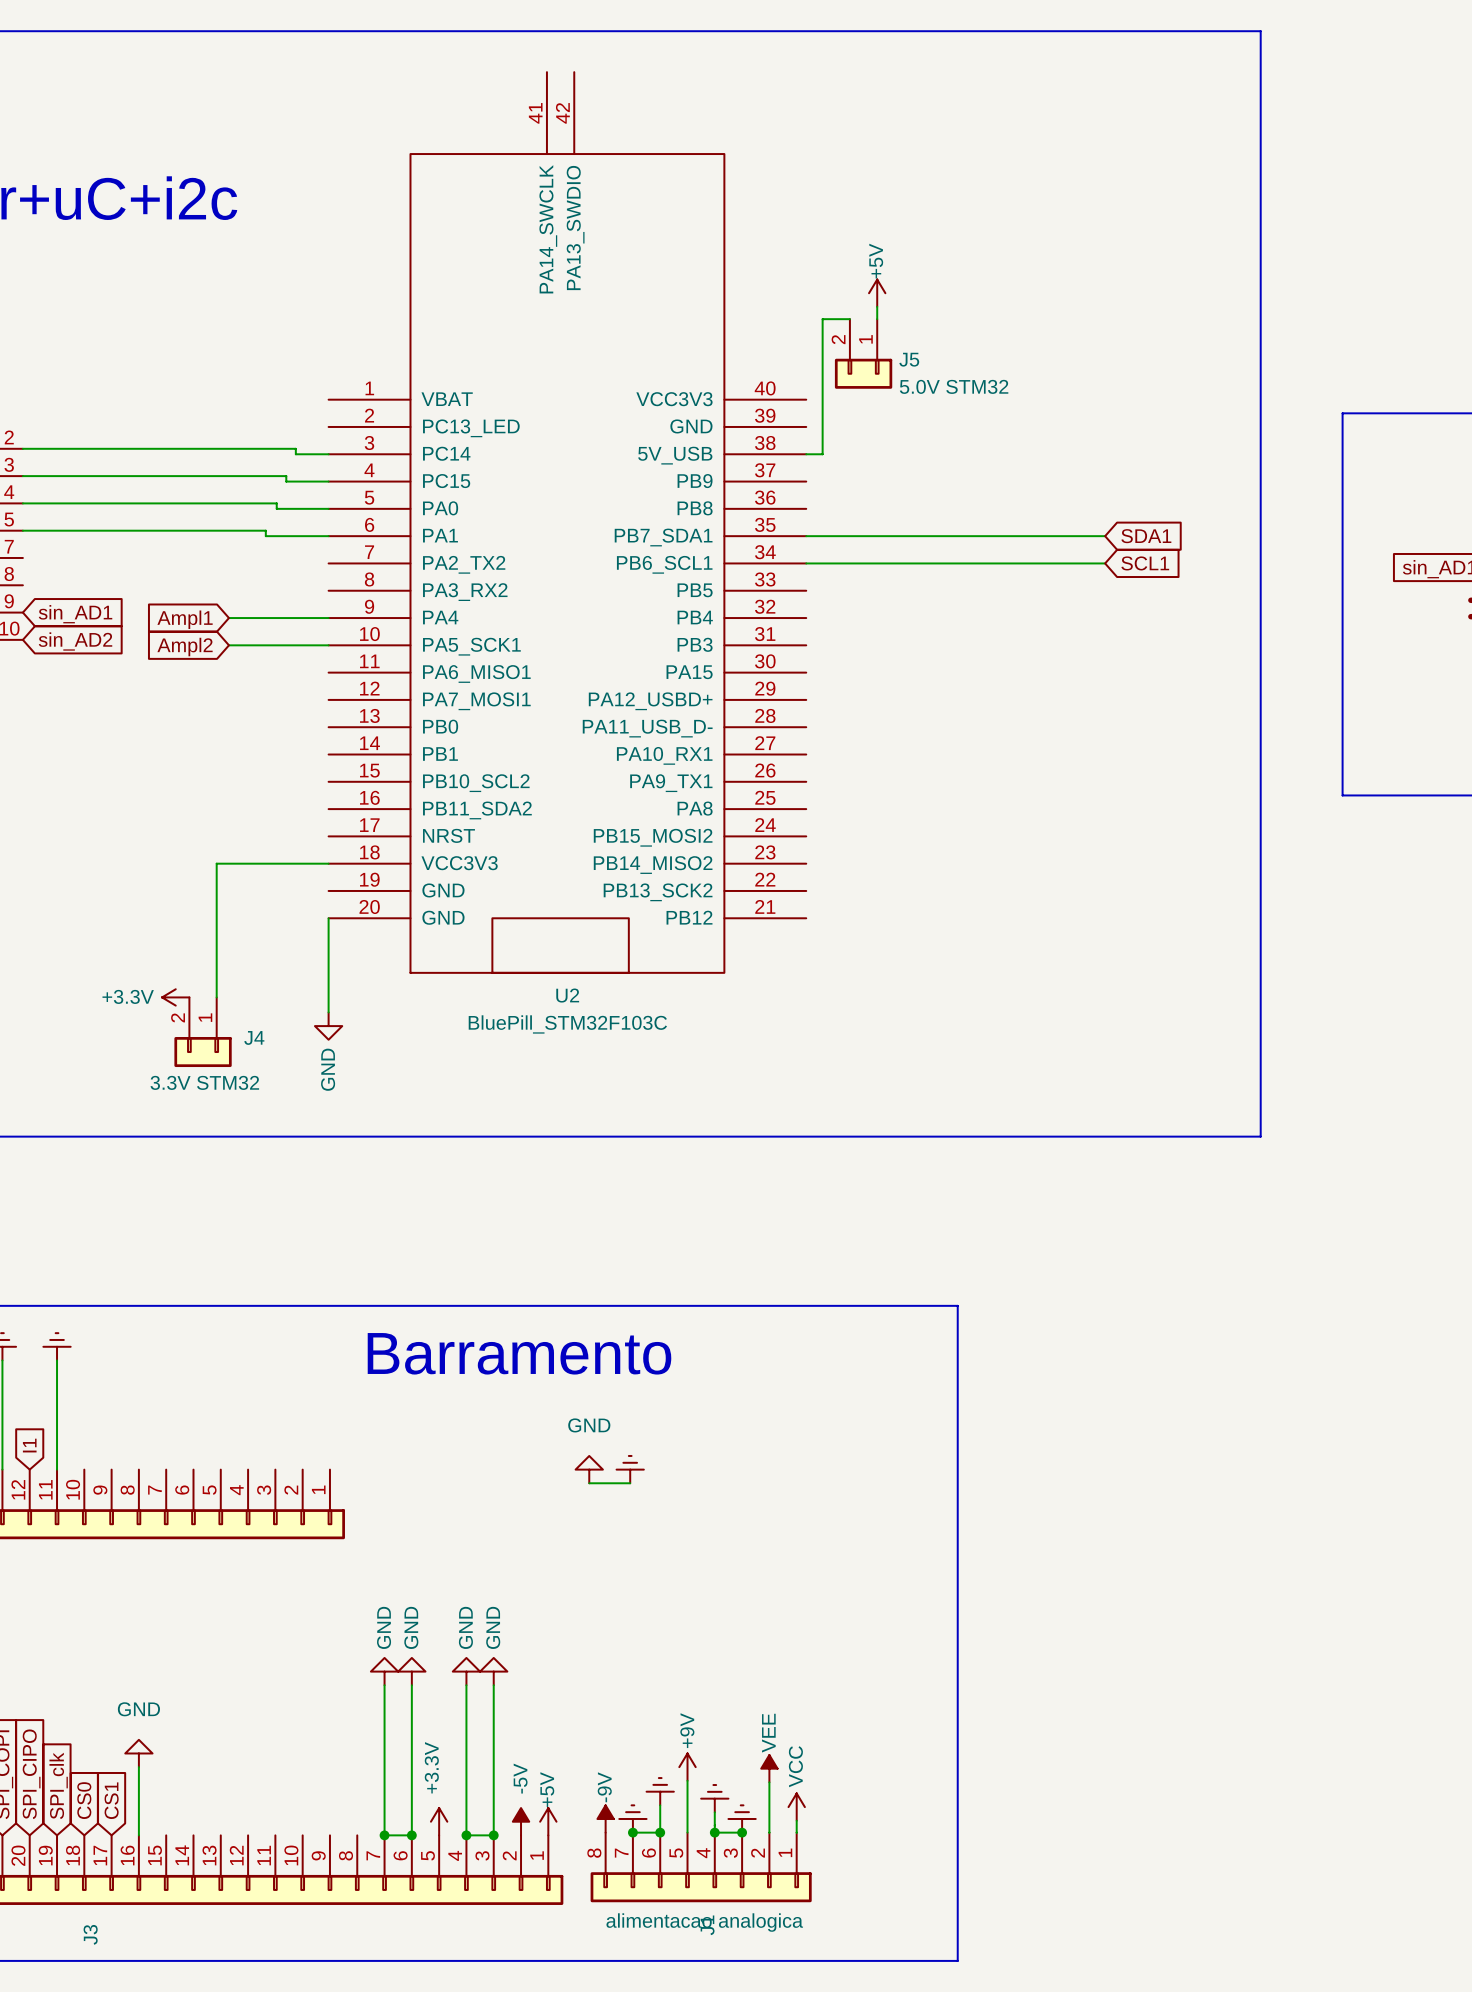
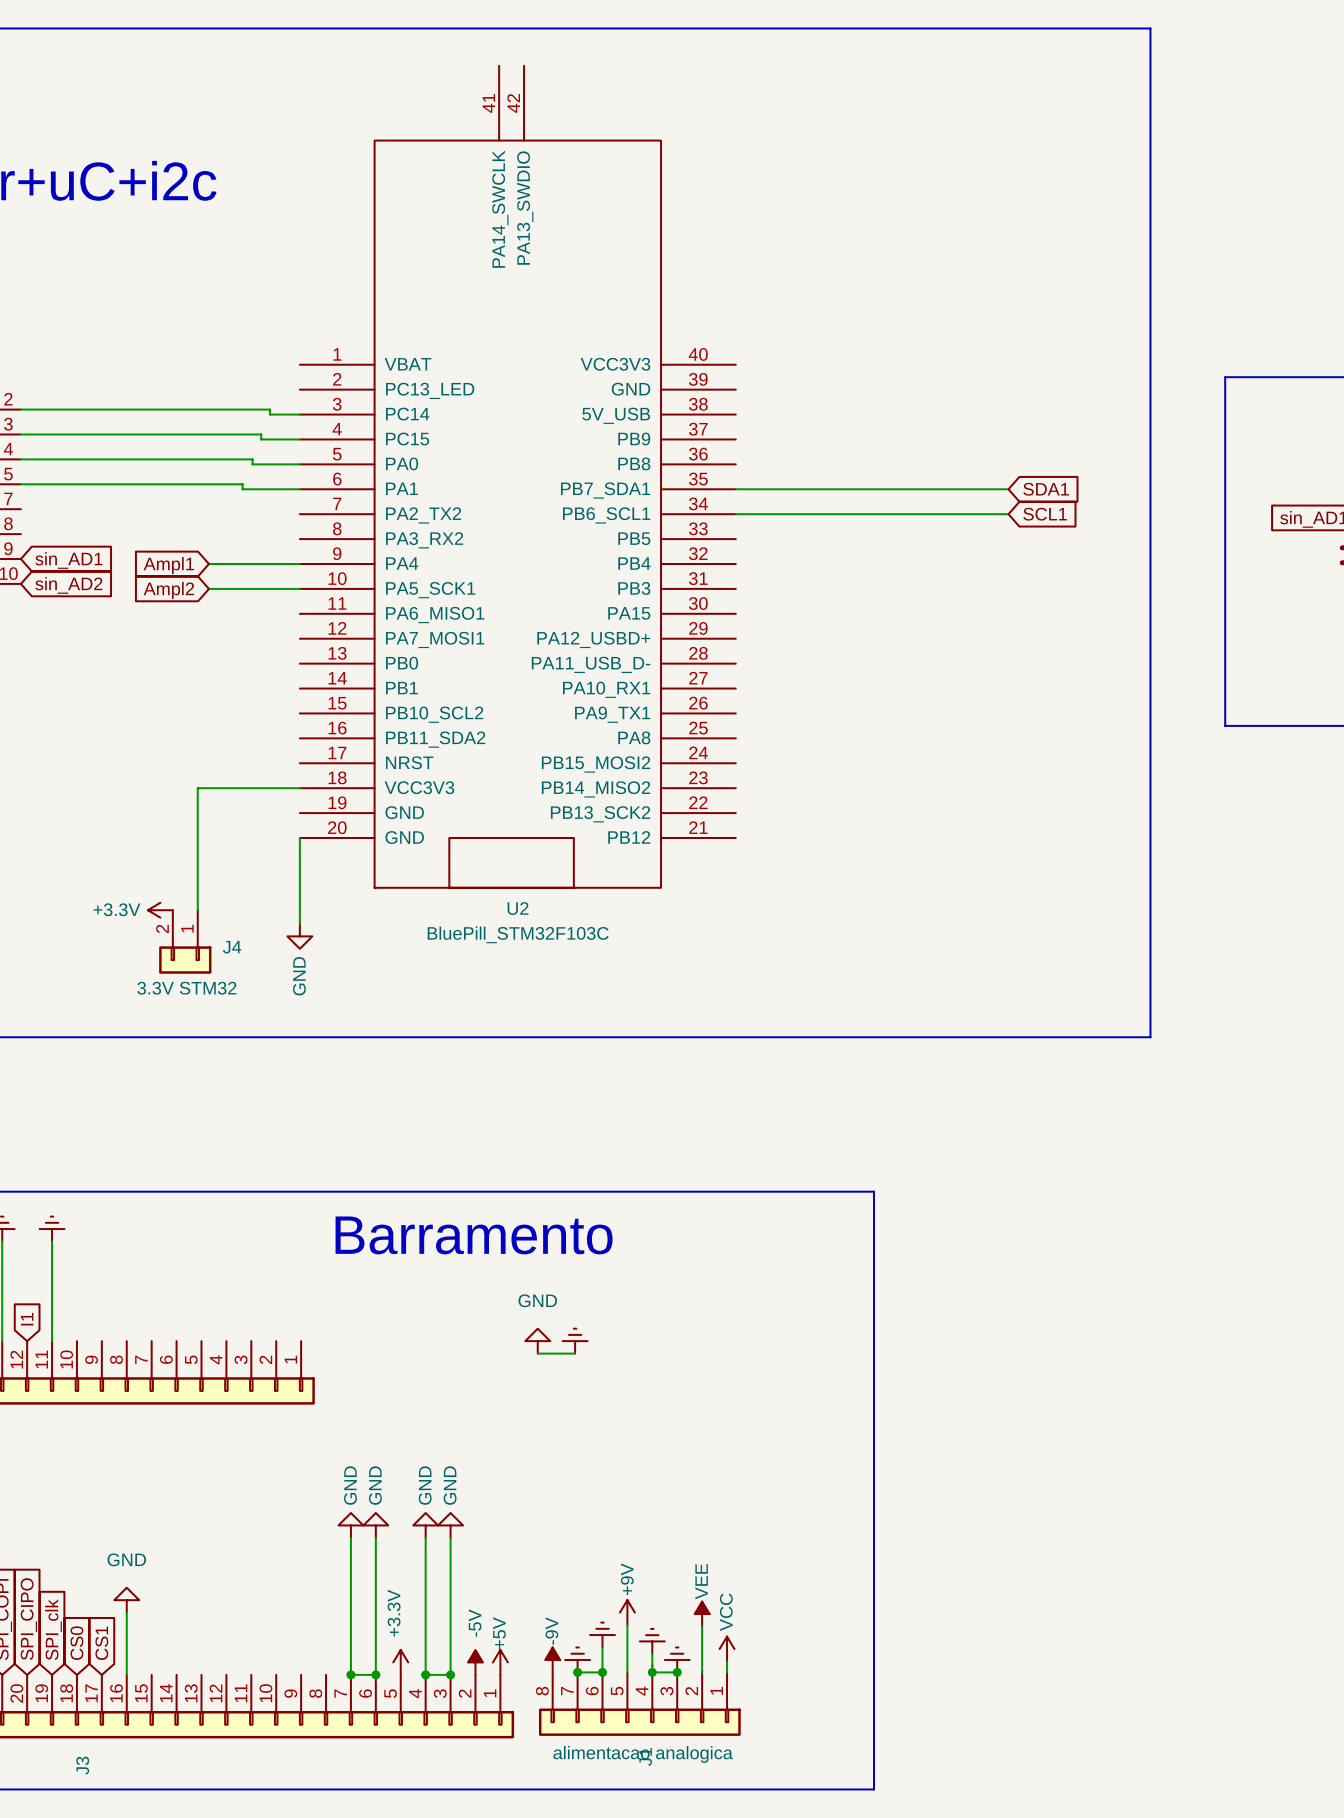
power symbol: +5V (877, 293) -> none
wire: (877, 306) (877, 319) -> none
wire: (849, 319) (822, 319) (822, 454) (806, 454) -> none
J5: 5.0V STM32 (863, 353) -> none

